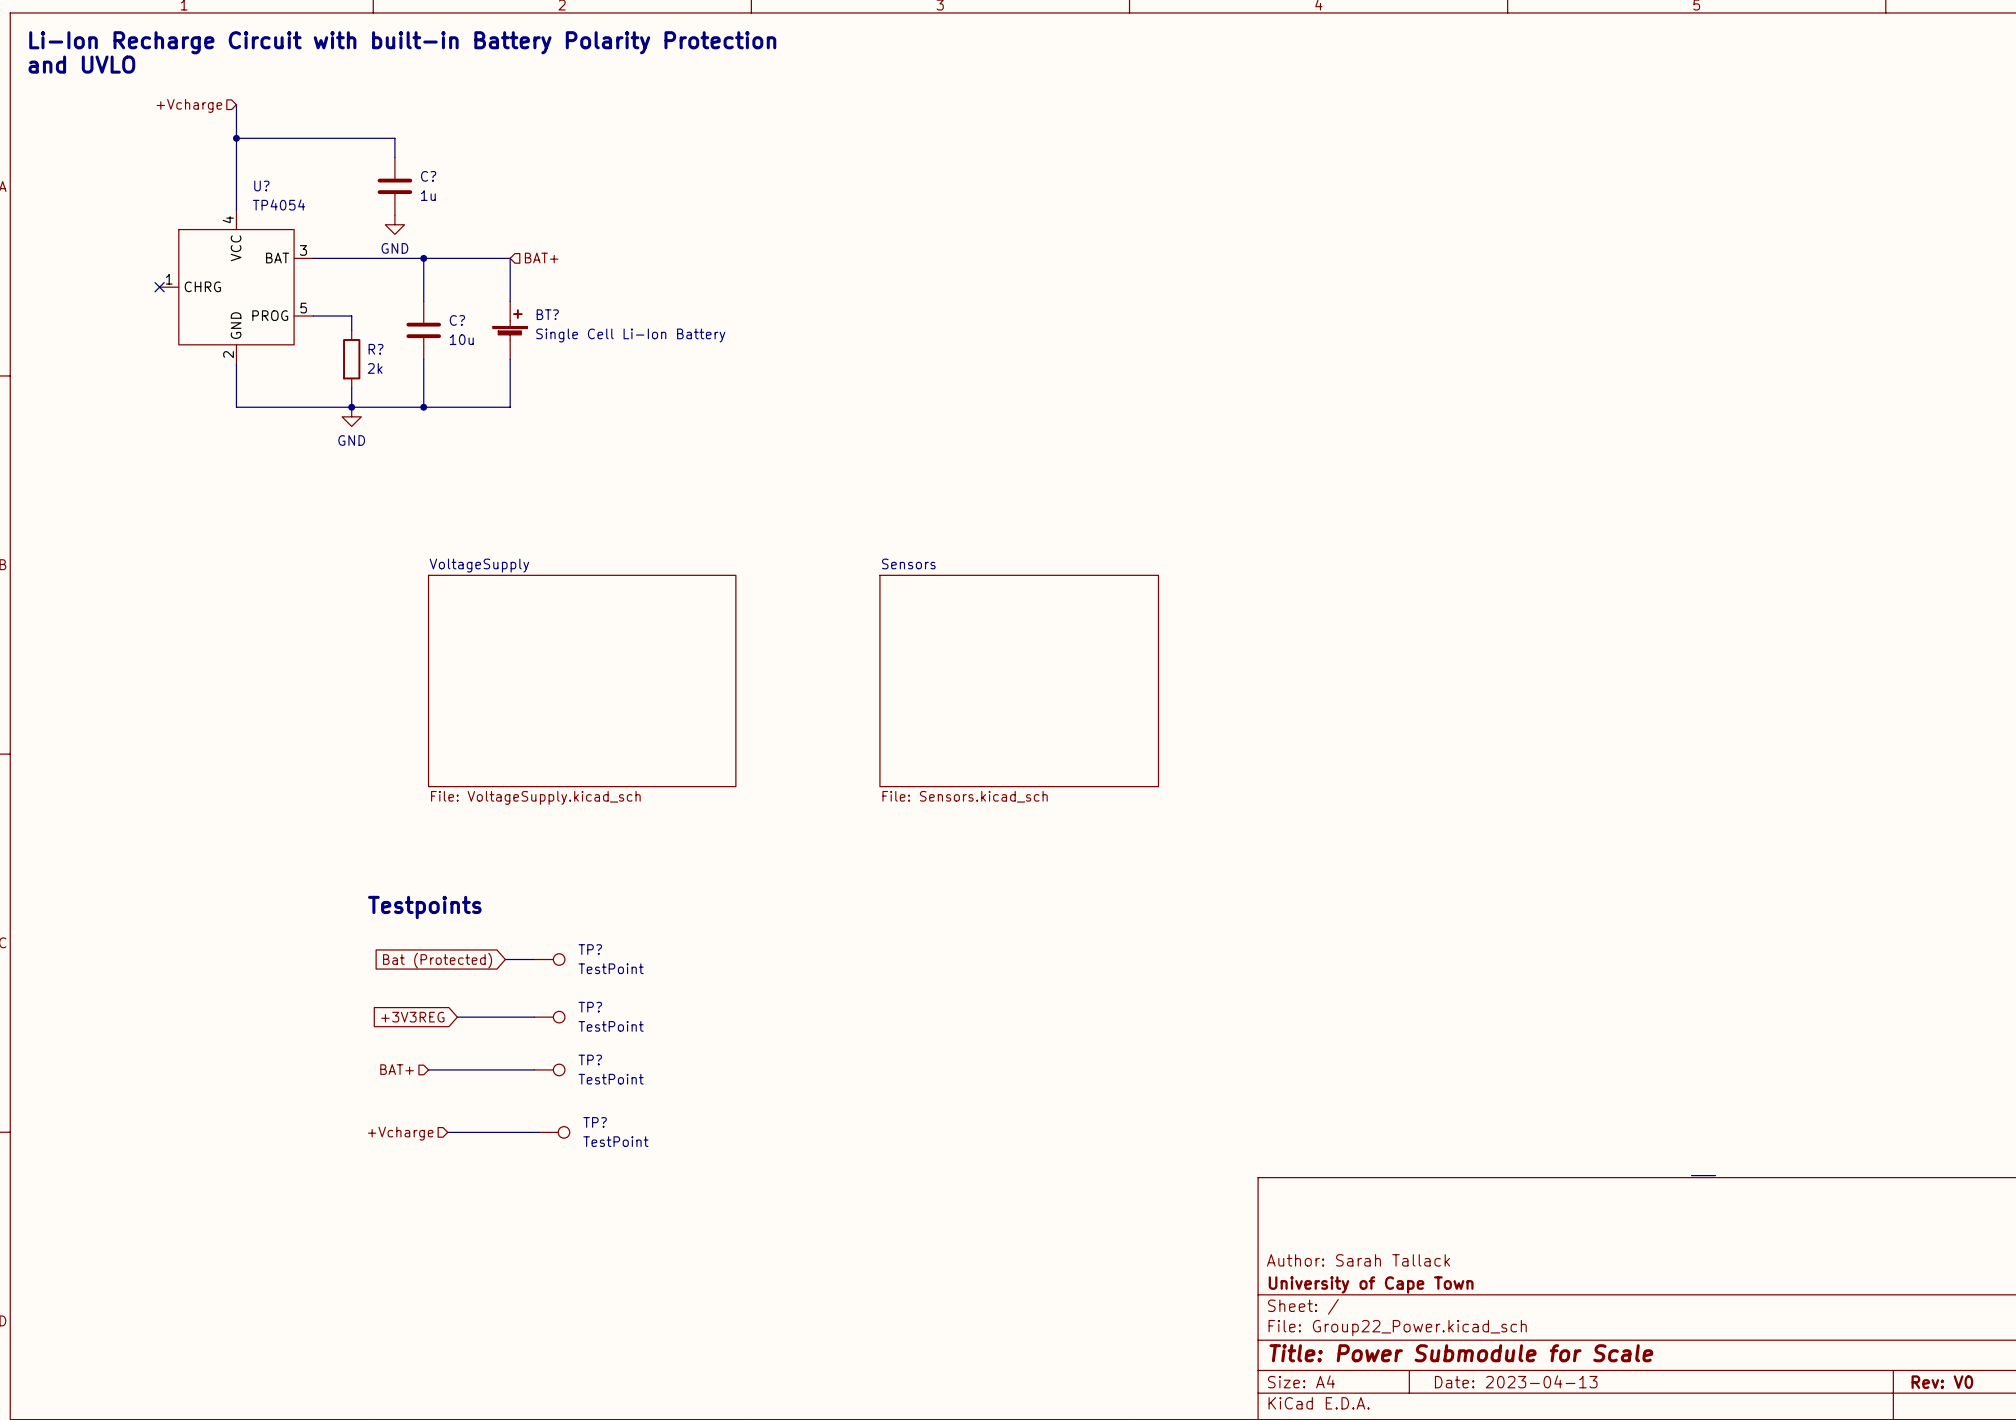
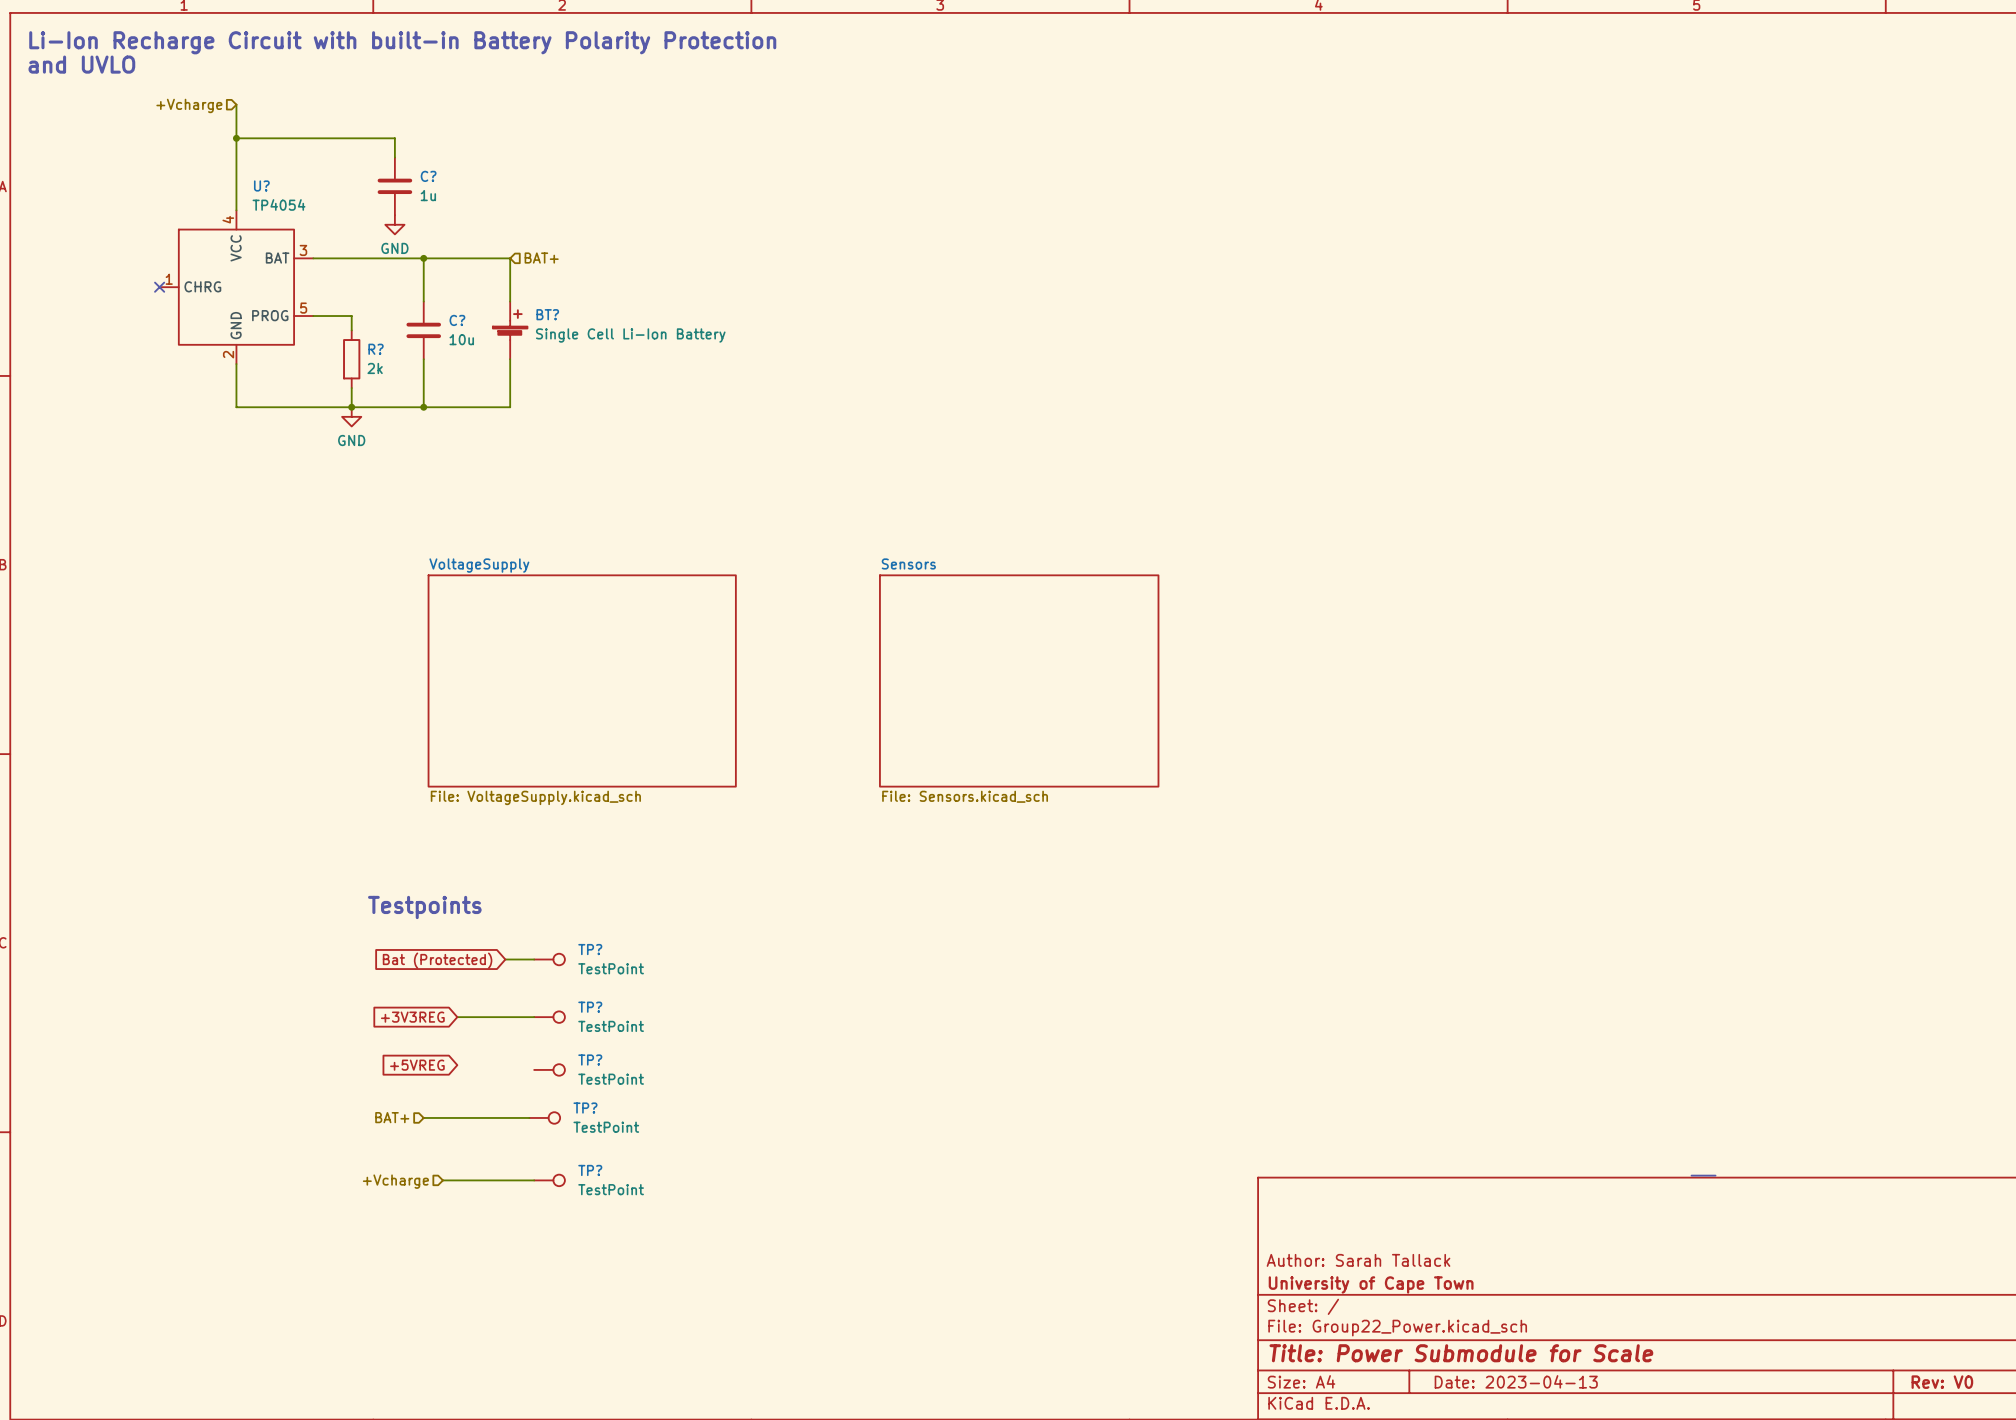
global label: none -> +5VREG (417, 1065)
hierarchical label position: BAT+ (397, 1069) -> BAT+ (392, 1117)
wire: (428, 1069) (534, 1069) -> (423, 1117) (529, 1117)
wire: (447, 1132) (538, 1132) -> (442, 1180) (534, 1180)
TP? position: (554, 1132) -> (544, 1117)
hierarchical label position: +Vcharge (400, 1133) -> +Vcharge (395, 1181)
TP?: none -> TestPoint (549, 1180)

